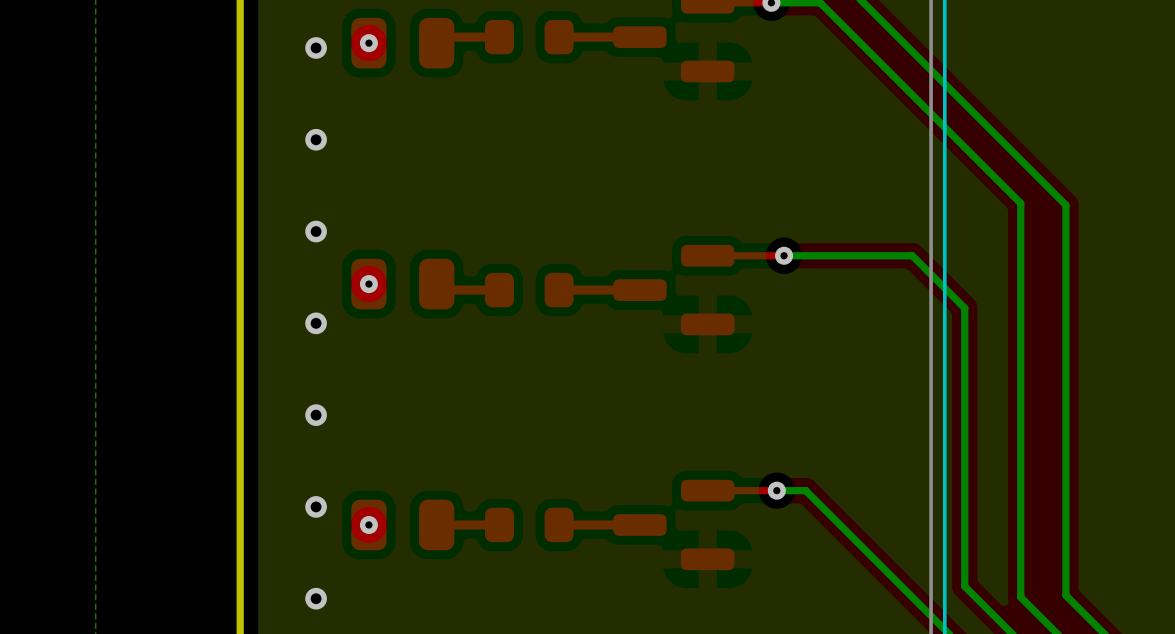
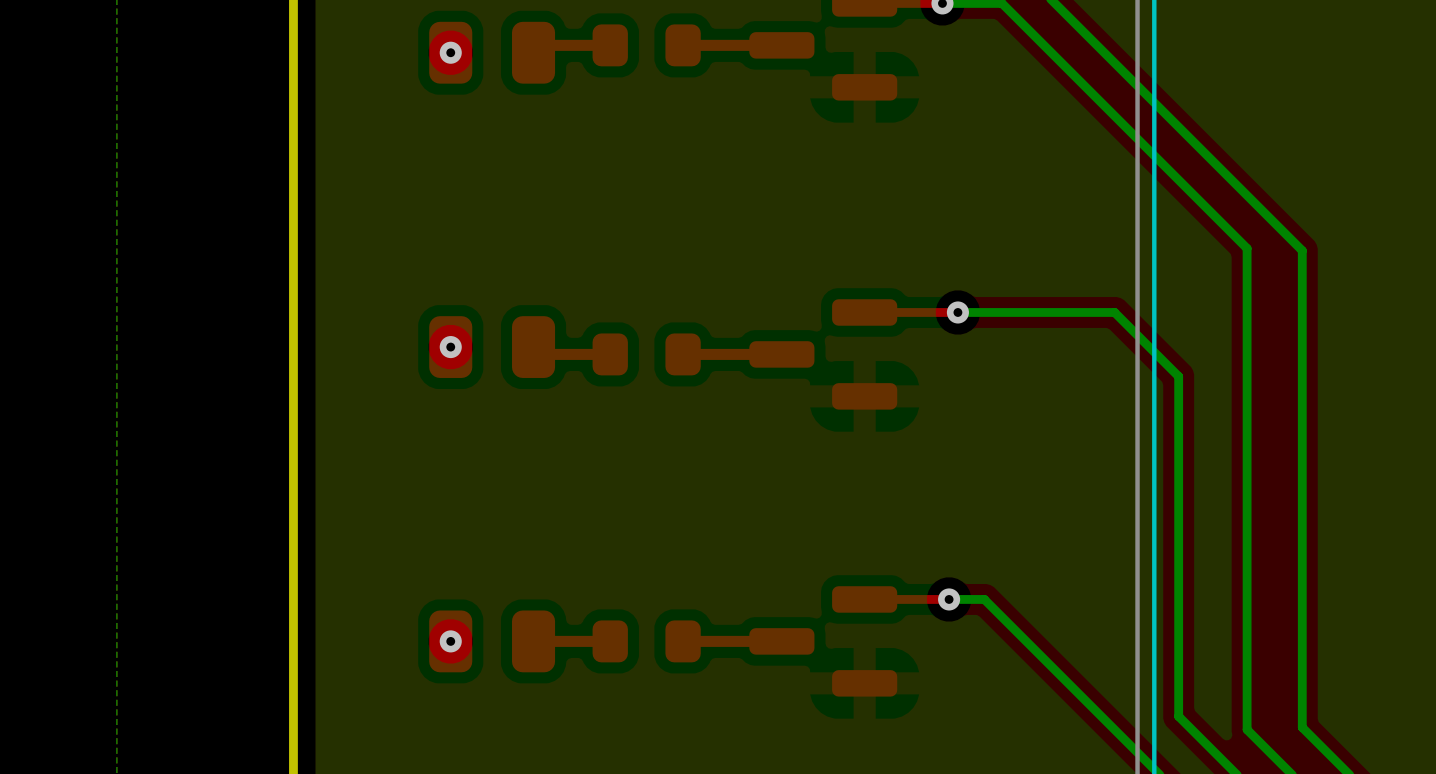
via: (316, 47) -> none
via: (316, 139) -> none
via: (316, 231) -> none
via: (316, 323) -> none
via: (316, 415) -> none
via: (316, 506) -> none
via: (316, 598) -> none

